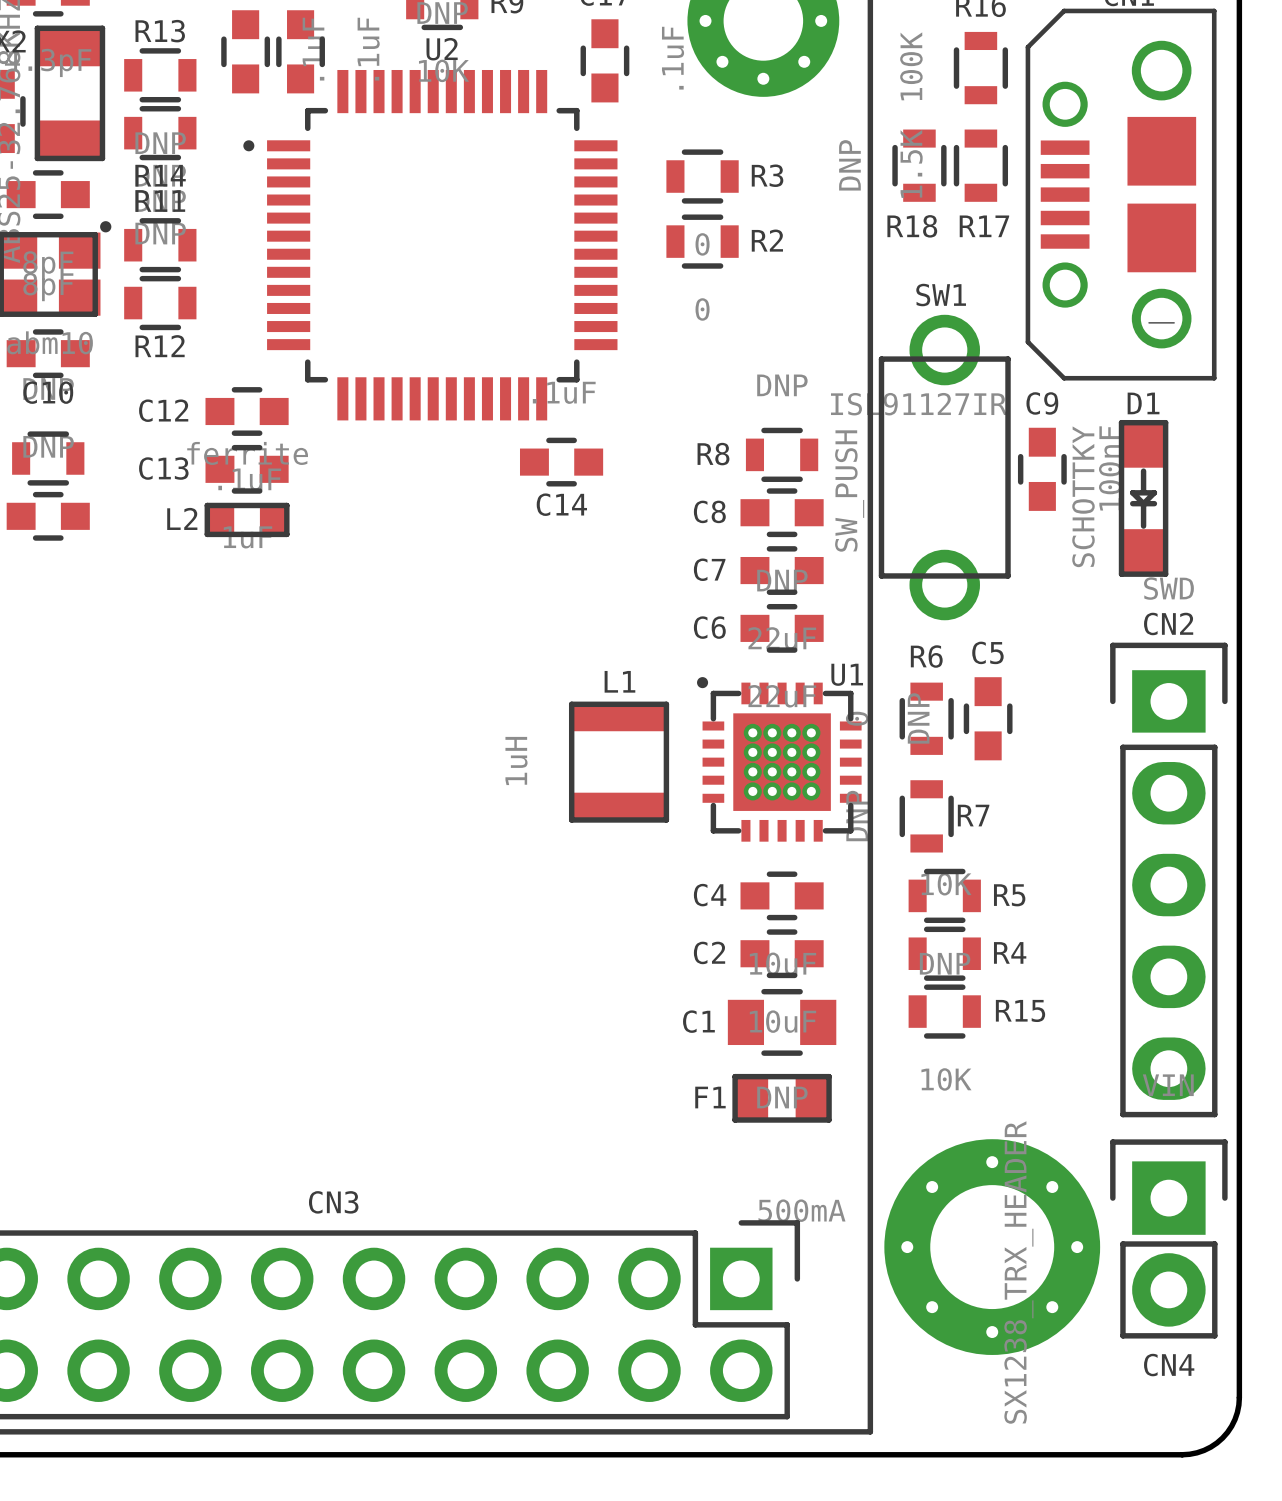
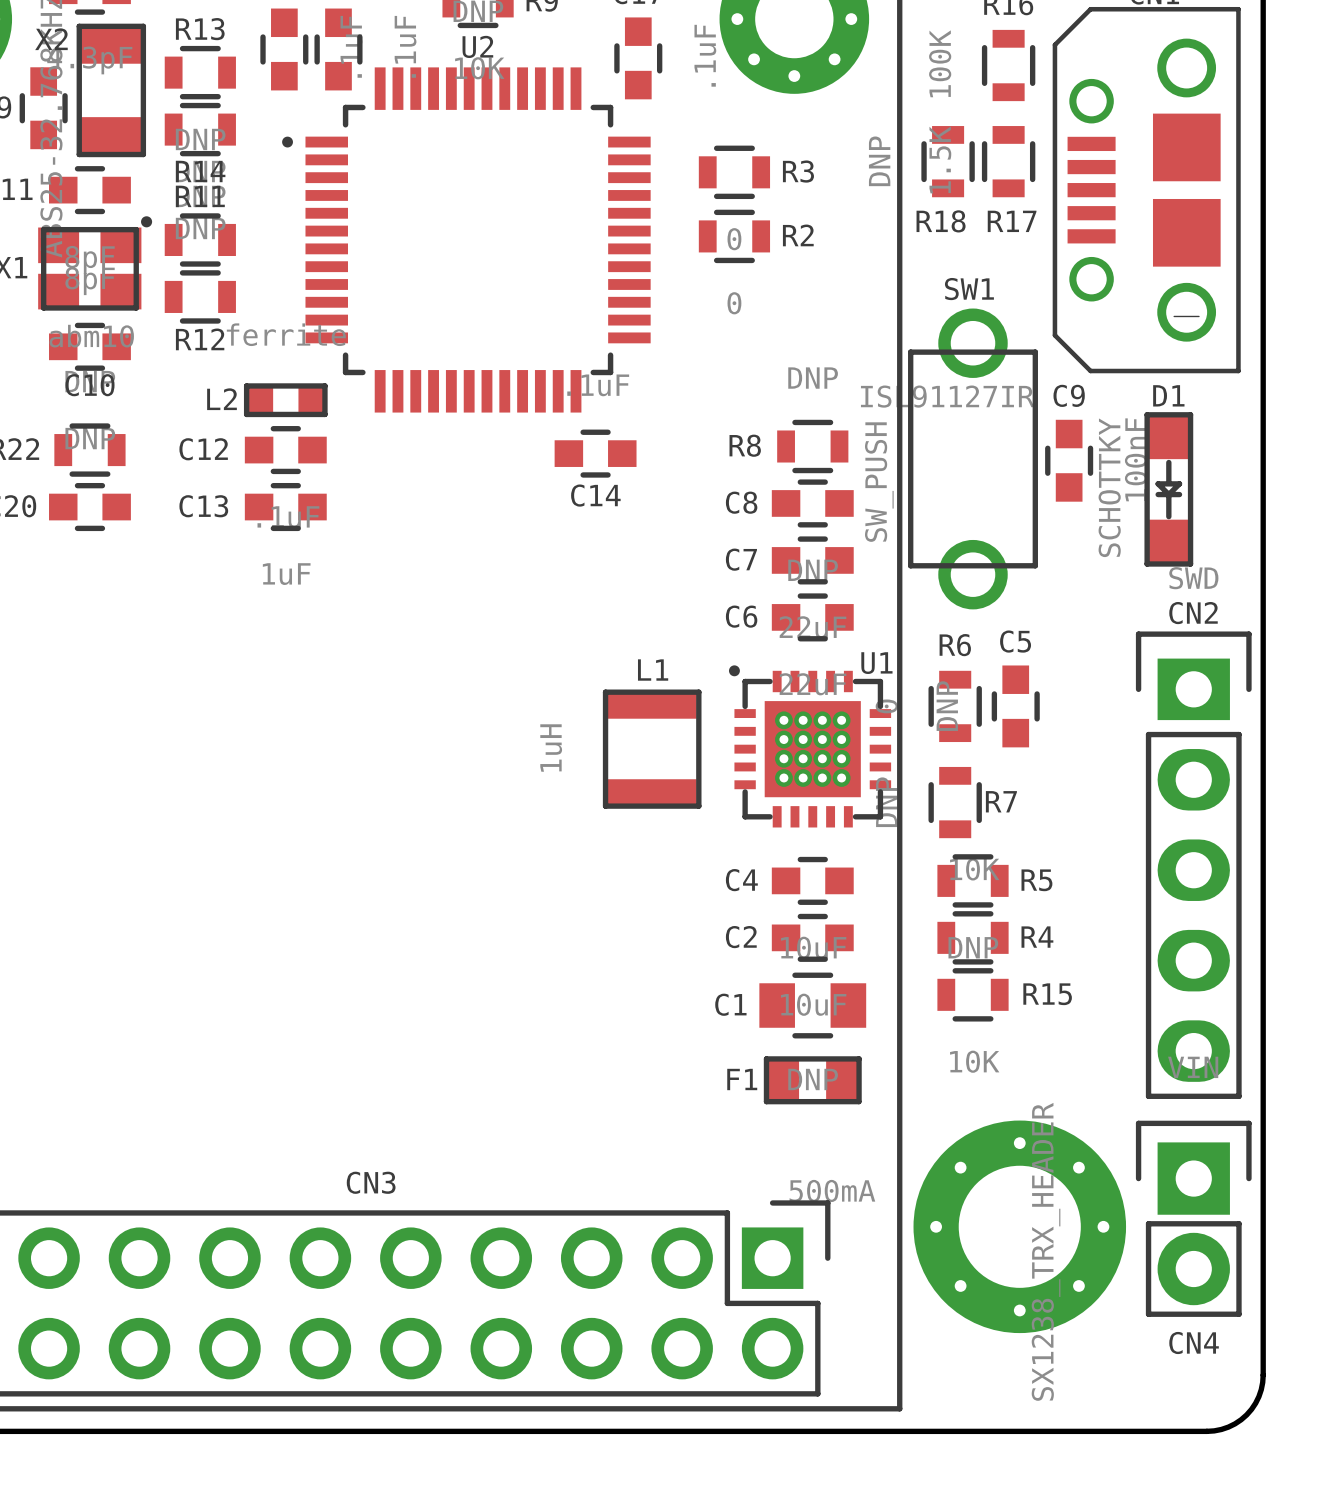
C12 position: (247, 411) -> (285, 450)
C13 position: (247, 469) -> (285, 507)
L2 position: (247, 519) -> (285, 400)

